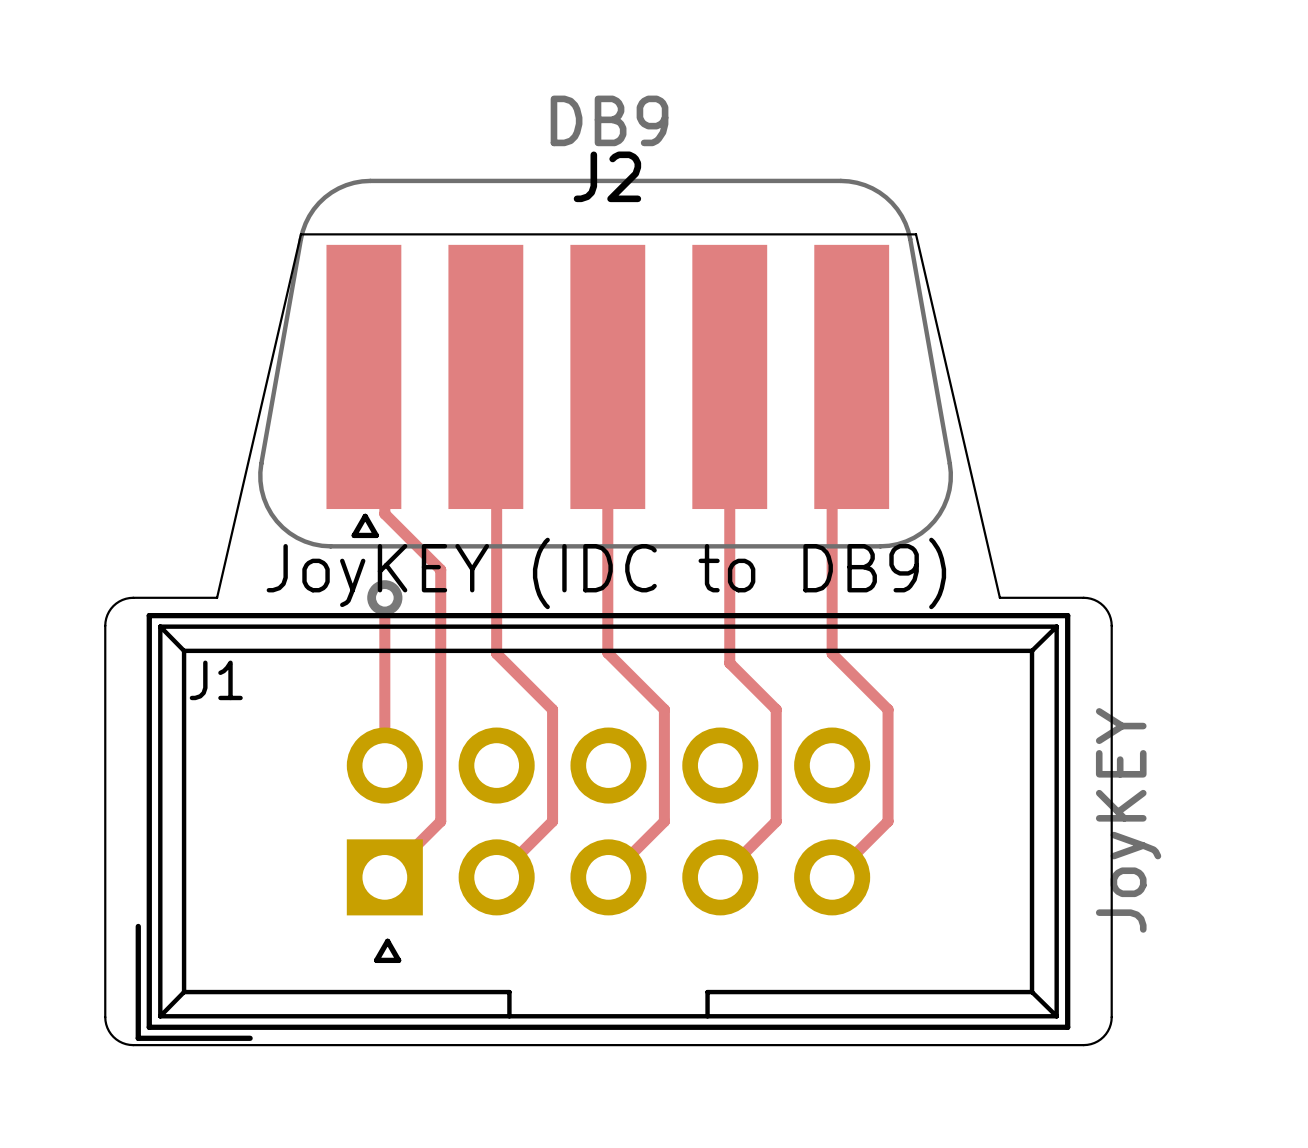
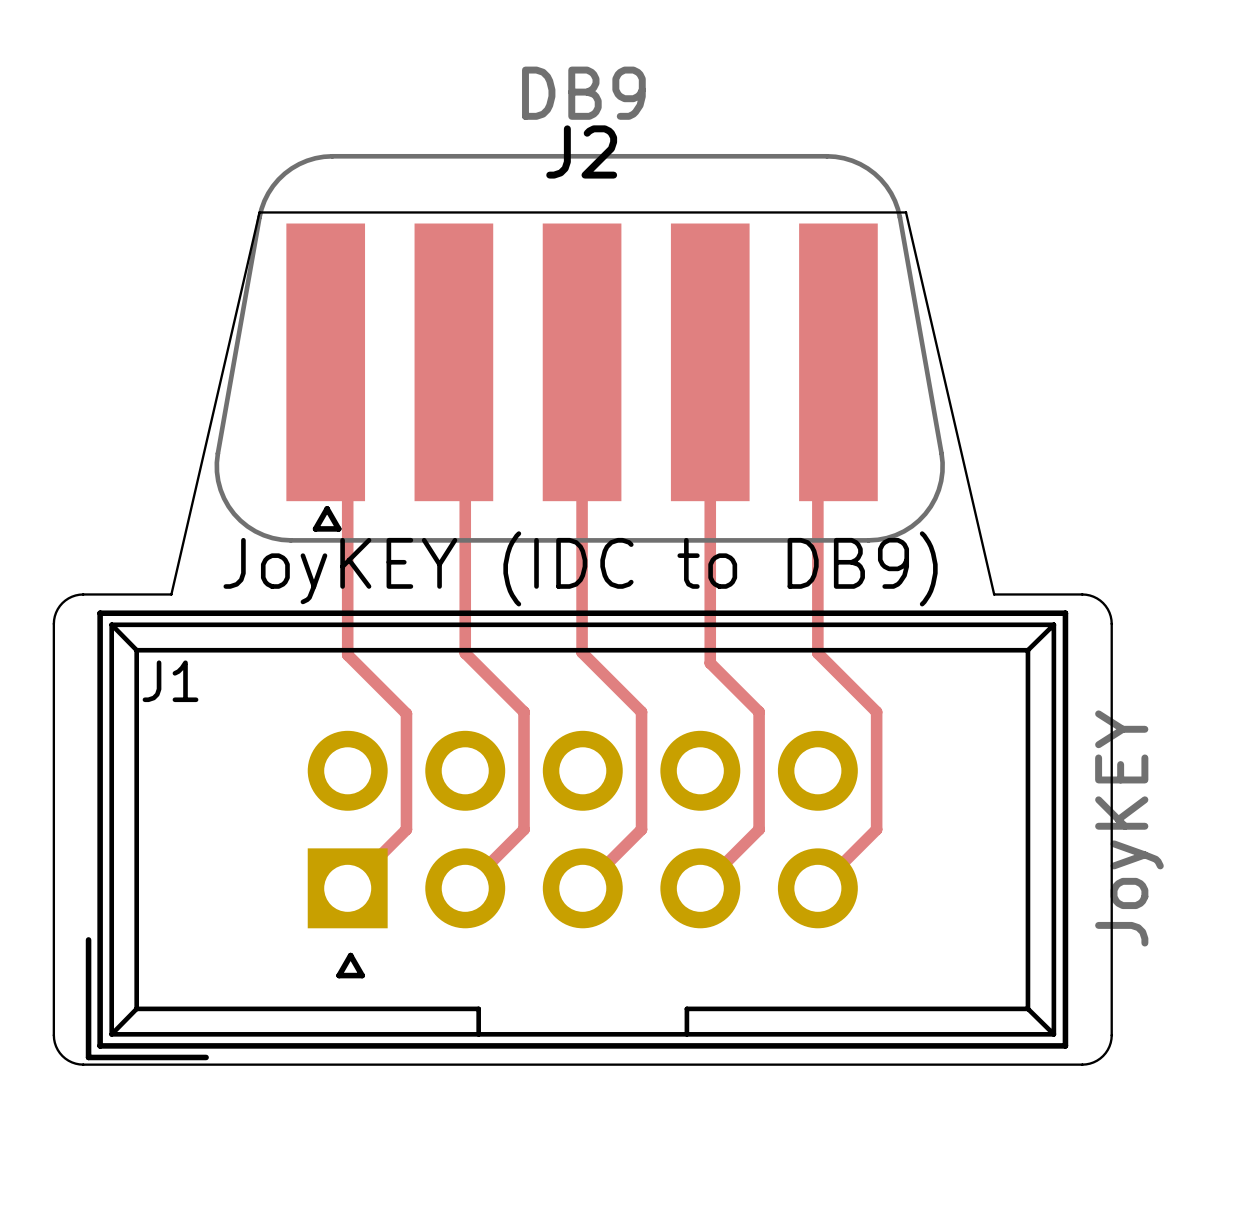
track: (384, 513) (440, 569) (440, 711) -> (347, 506) (347, 594)
via: (384, 597) -> none
track: (384, 655) (384, 765) -> (347, 654) (406, 713)

